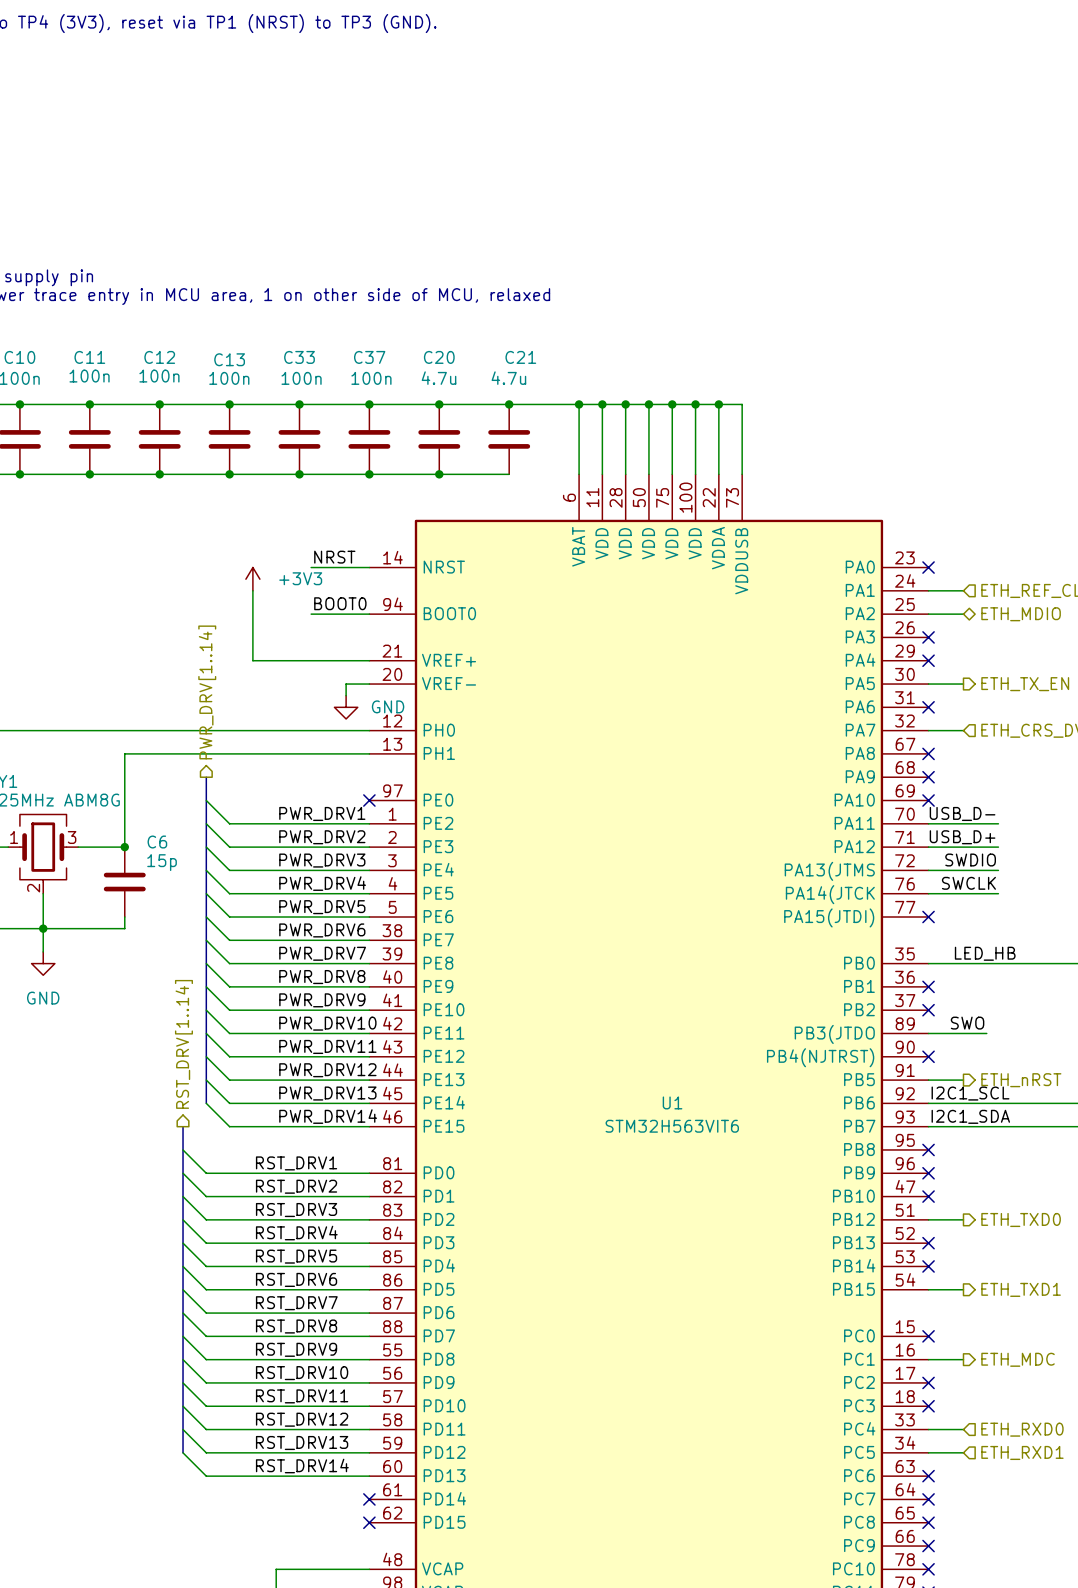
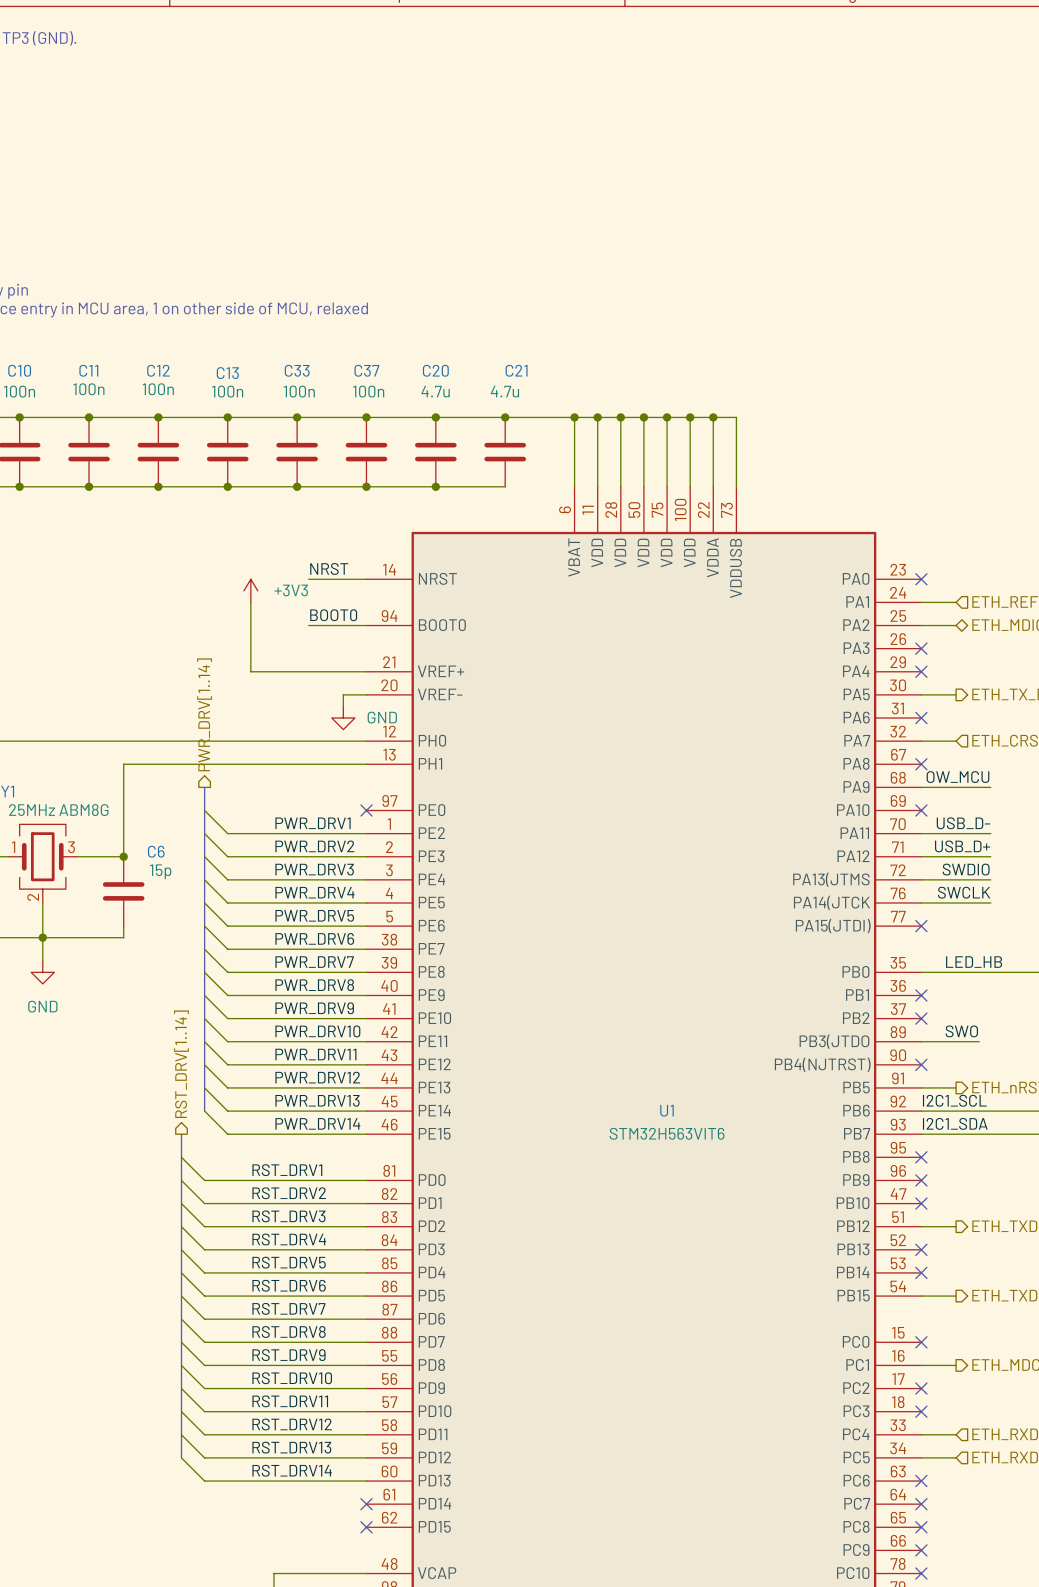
label: none -> OW_MCU (957, 777)
wire: none -> (921, 787) (990, 787)
no-connect mark: (928, 777) -> none

